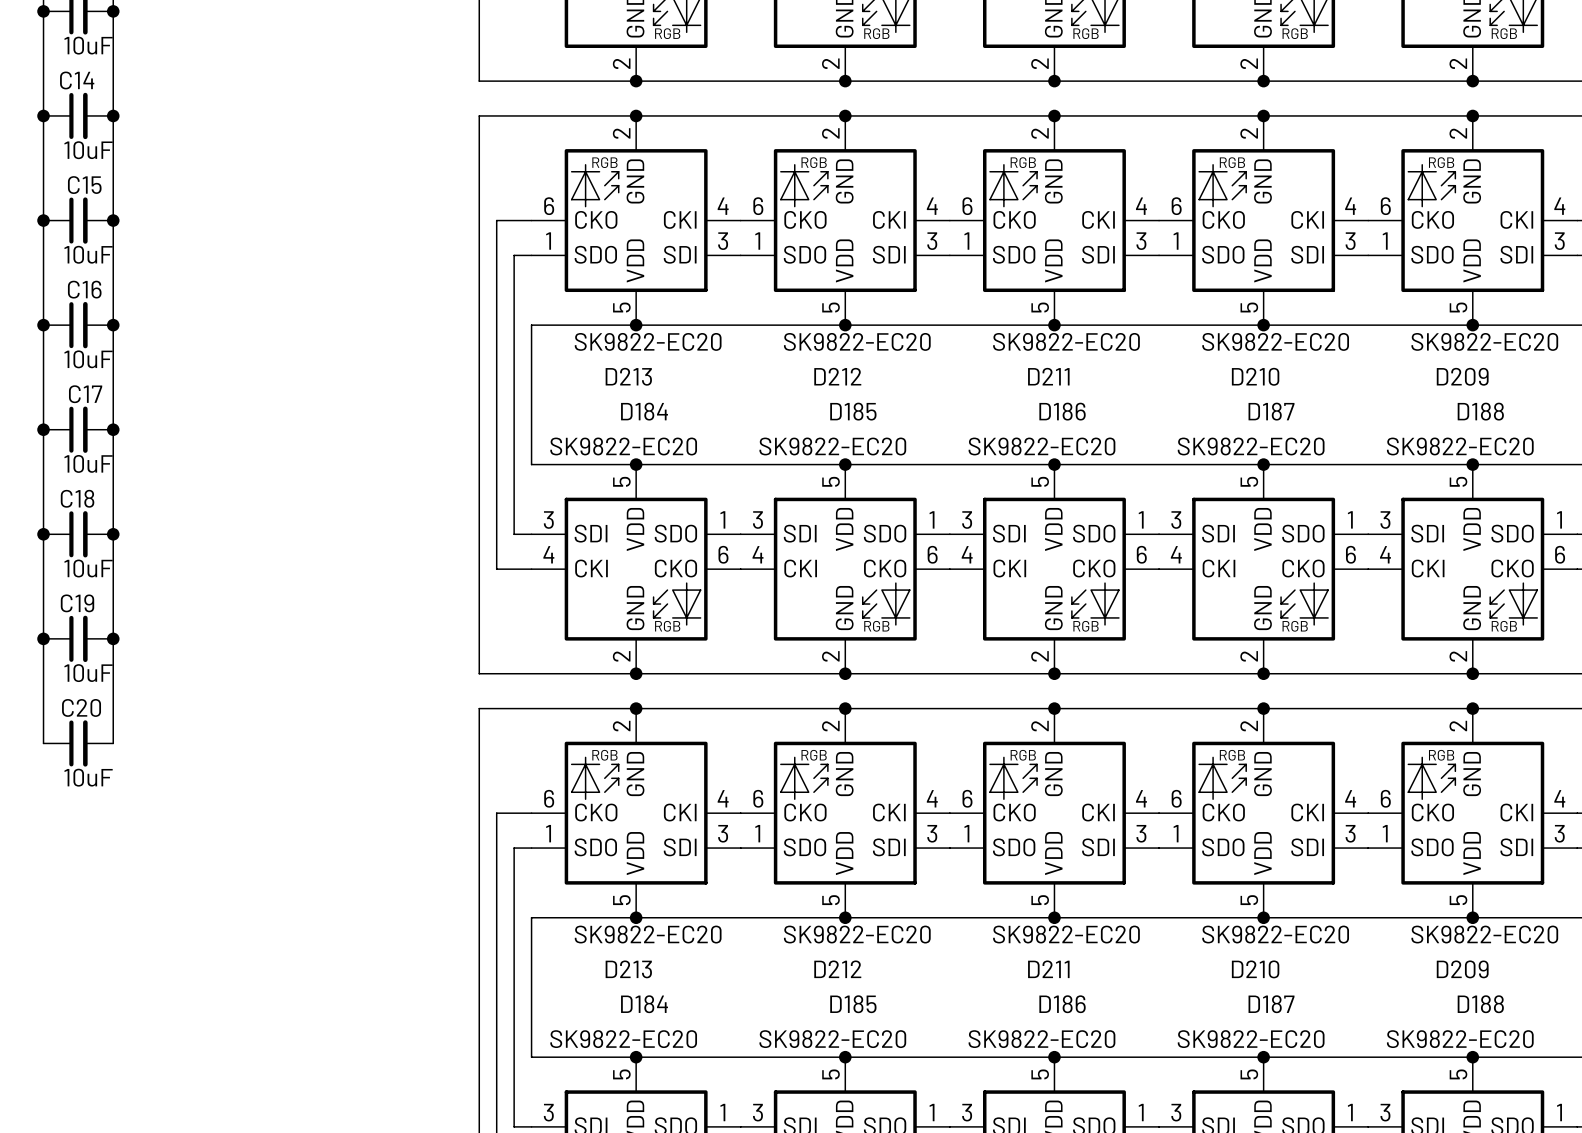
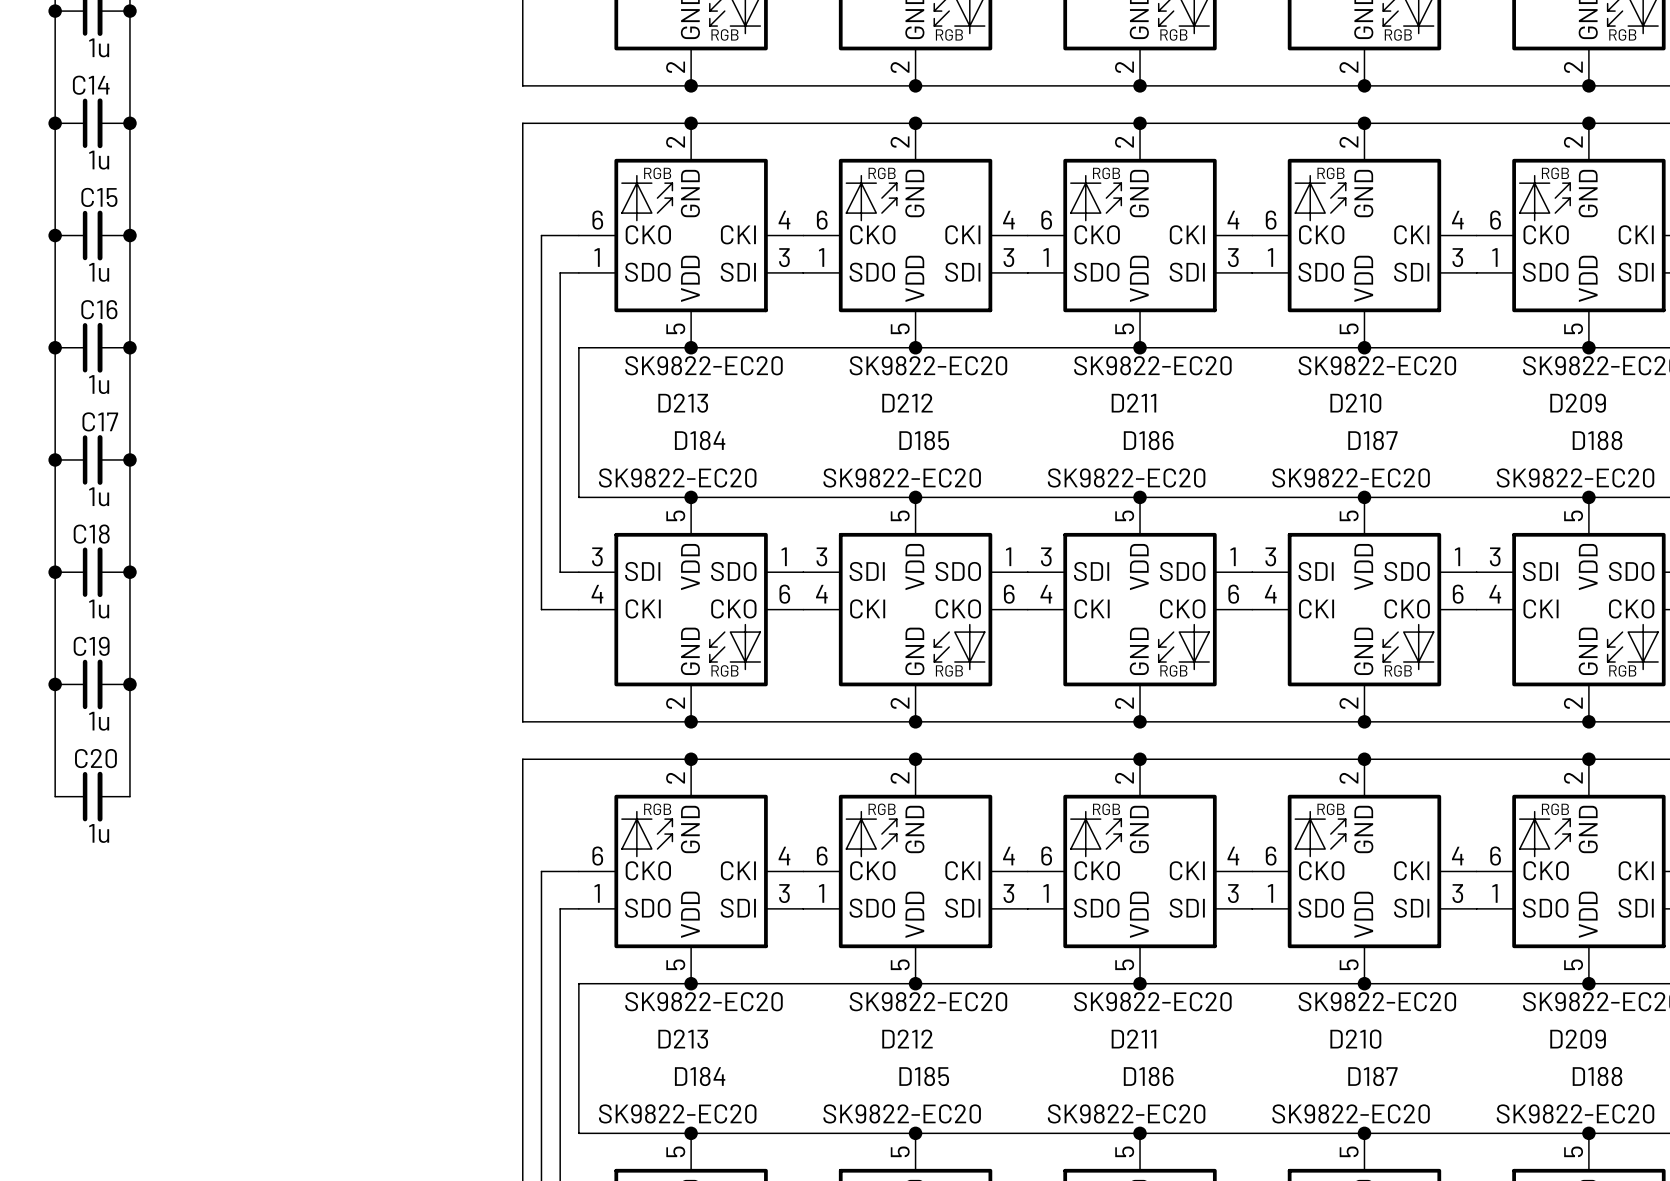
part value: 10uF (88, 45) -> 1u (99, 47)
C14 value: 10uF (88, 150) -> 1u (99, 160)
C15 value: 10uF (88, 254) -> 1u (99, 272)
C16 value: 10uF (88, 359) -> 1u (99, 384)
C17 value: 10uF (88, 463) -> 1u (99, 496)
C18 value: 10uF (88, 568) -> 1u (99, 609)
C19 value: 10uF (88, 673) -> 1u (99, 721)
C20 value: 10uF (88, 777) -> 1u (99, 833)

